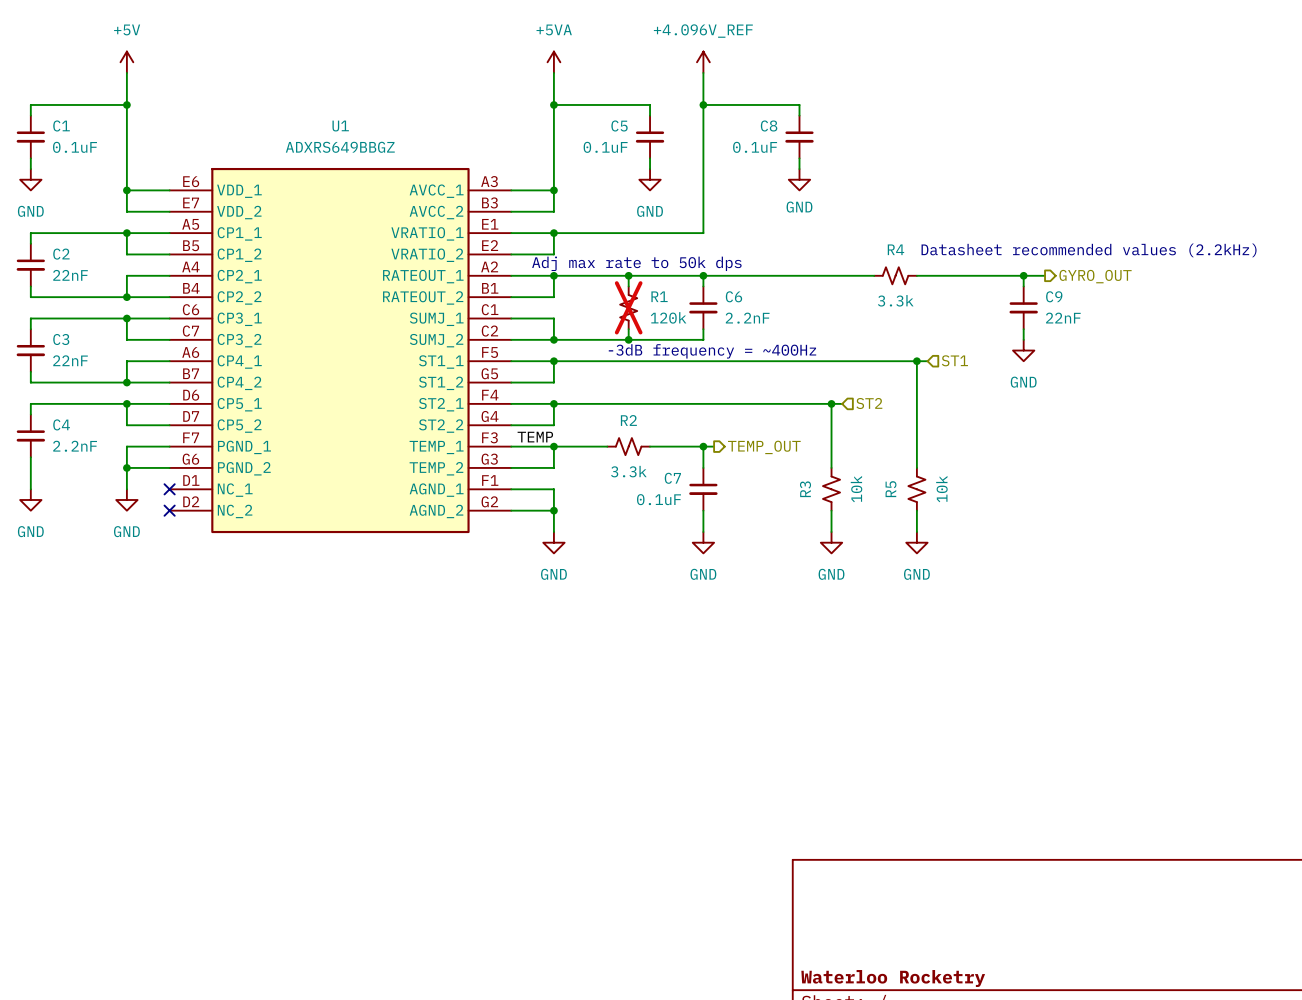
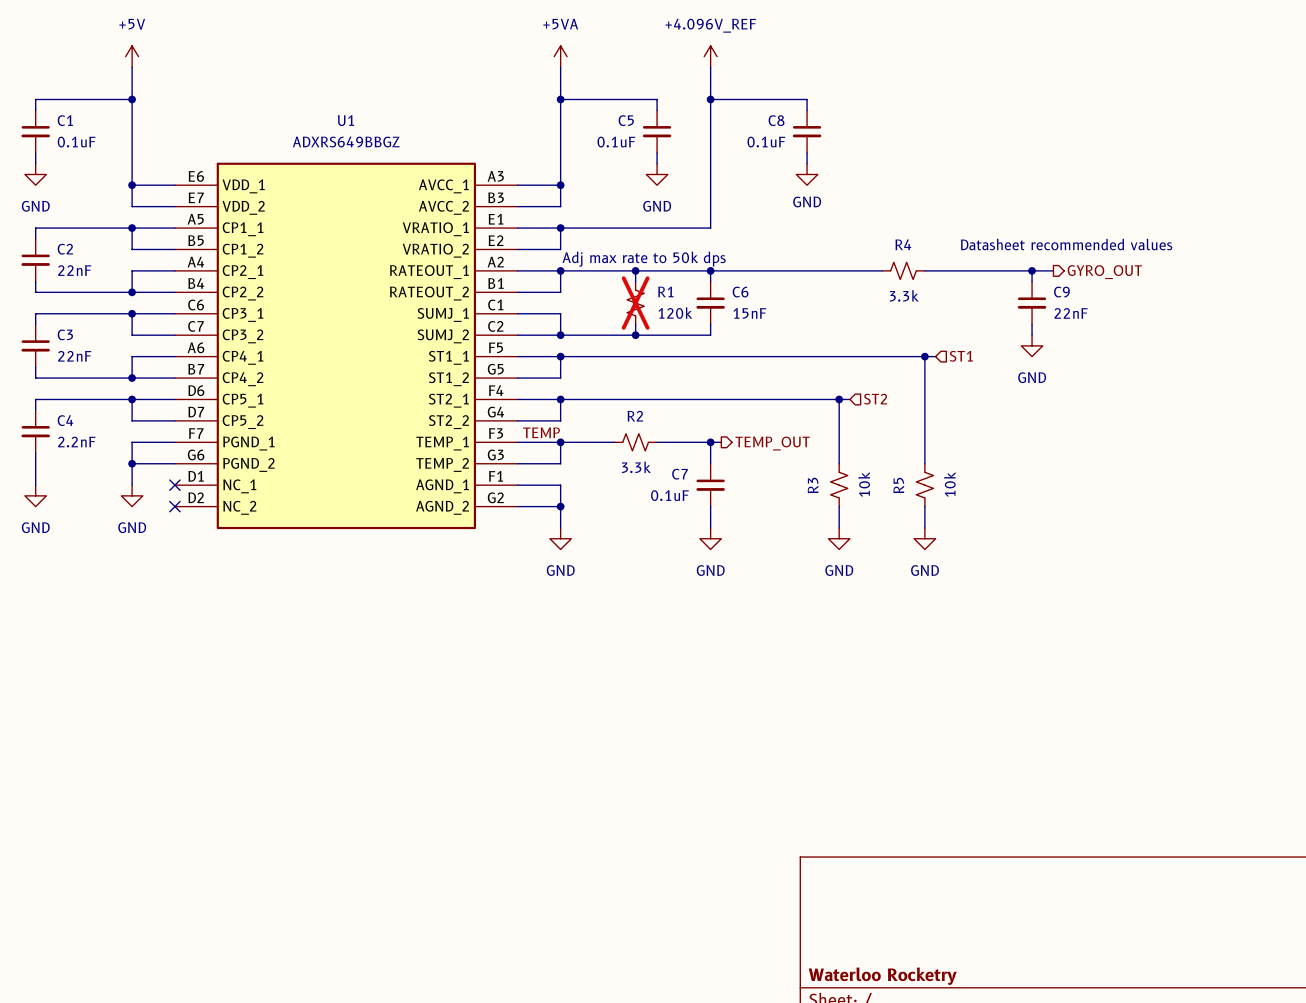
text: Datasheet recommended values (2.2kHz) (1089, 250) -> Datasheet recommended values (1066, 244)
C6 value: 2.2nF (747, 318) -> 15nF (749, 313)
text: -3dB frequency = ~400Hz (712, 351) -> none

